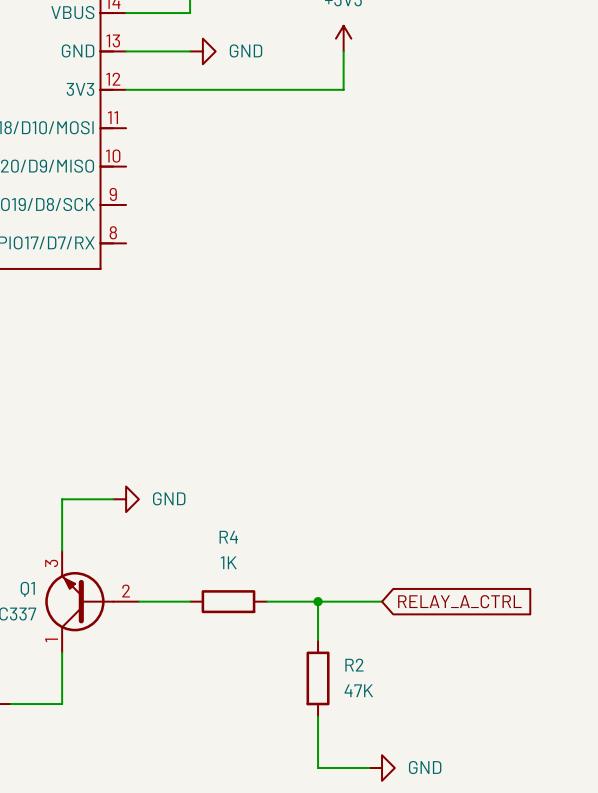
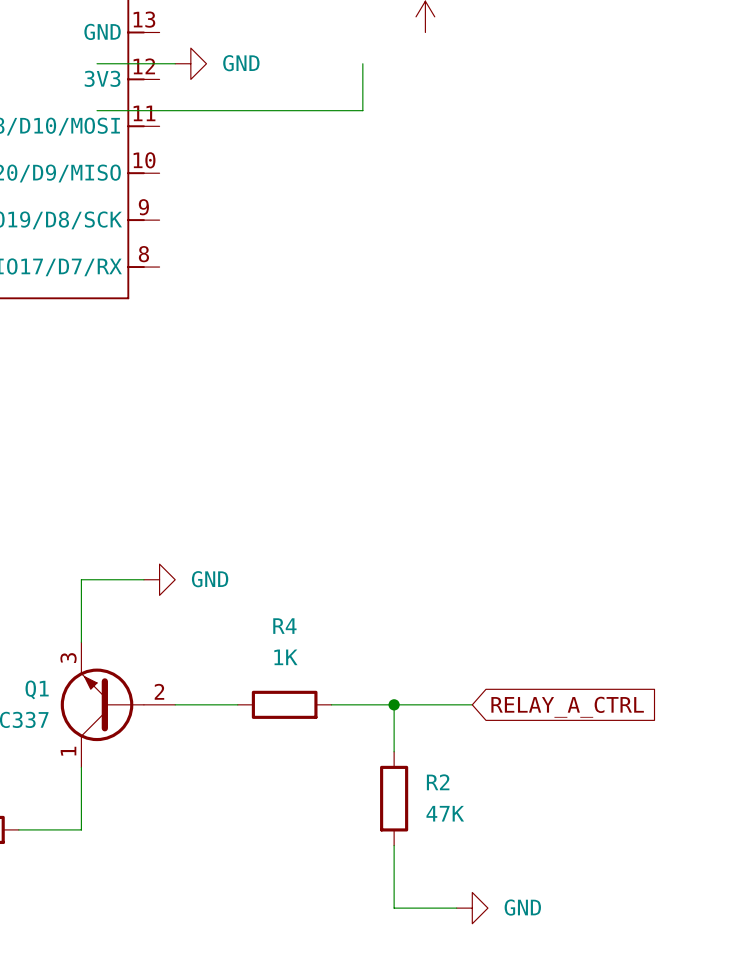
wire: (126, 51) (190, 51) -> (97, 63) (175, 63)
power symbol position: GND (202, 51) -> GND (190, 63)
wire: (343, 51) (343, 89) (126, 89) -> (362, 63) (362, 110) (97, 110)

